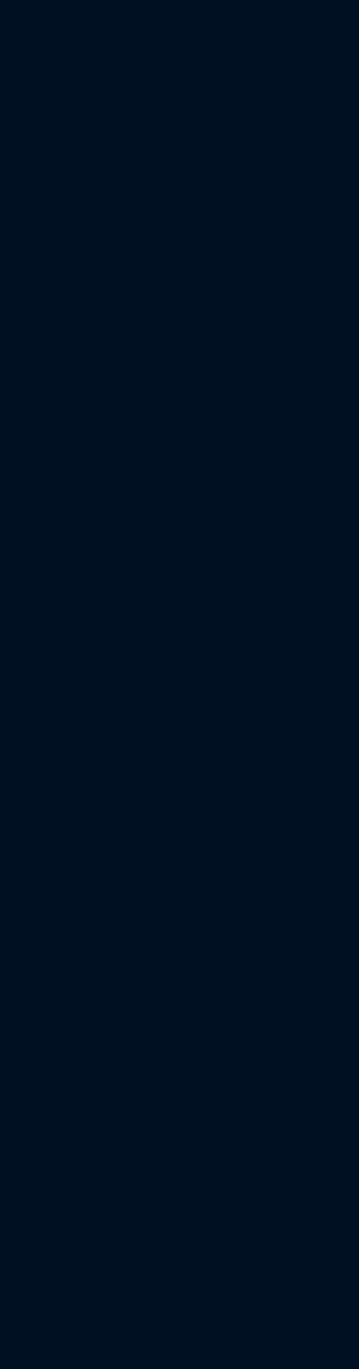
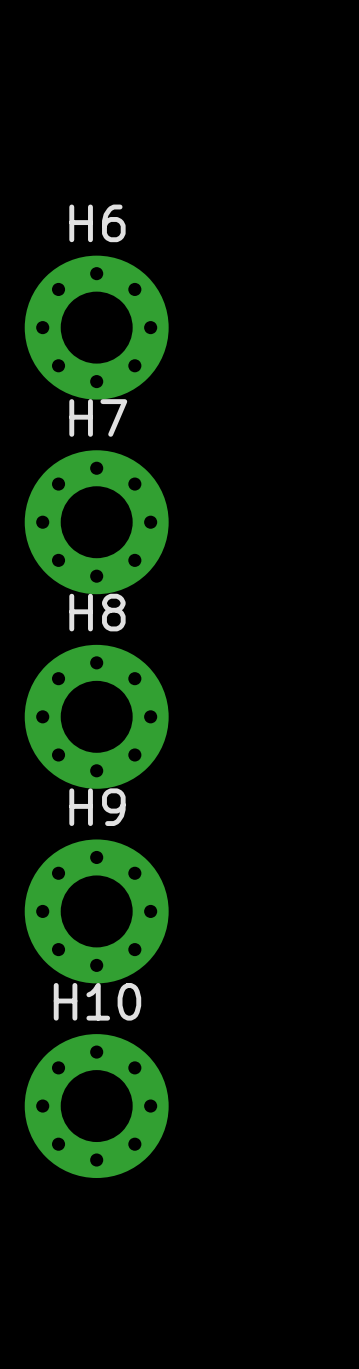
H6: none -> (96, 327)
H7: none -> (96, 522)
H8: none -> (96, 716)
H9: none -> (96, 911)
H10: none -> (96, 1106)

